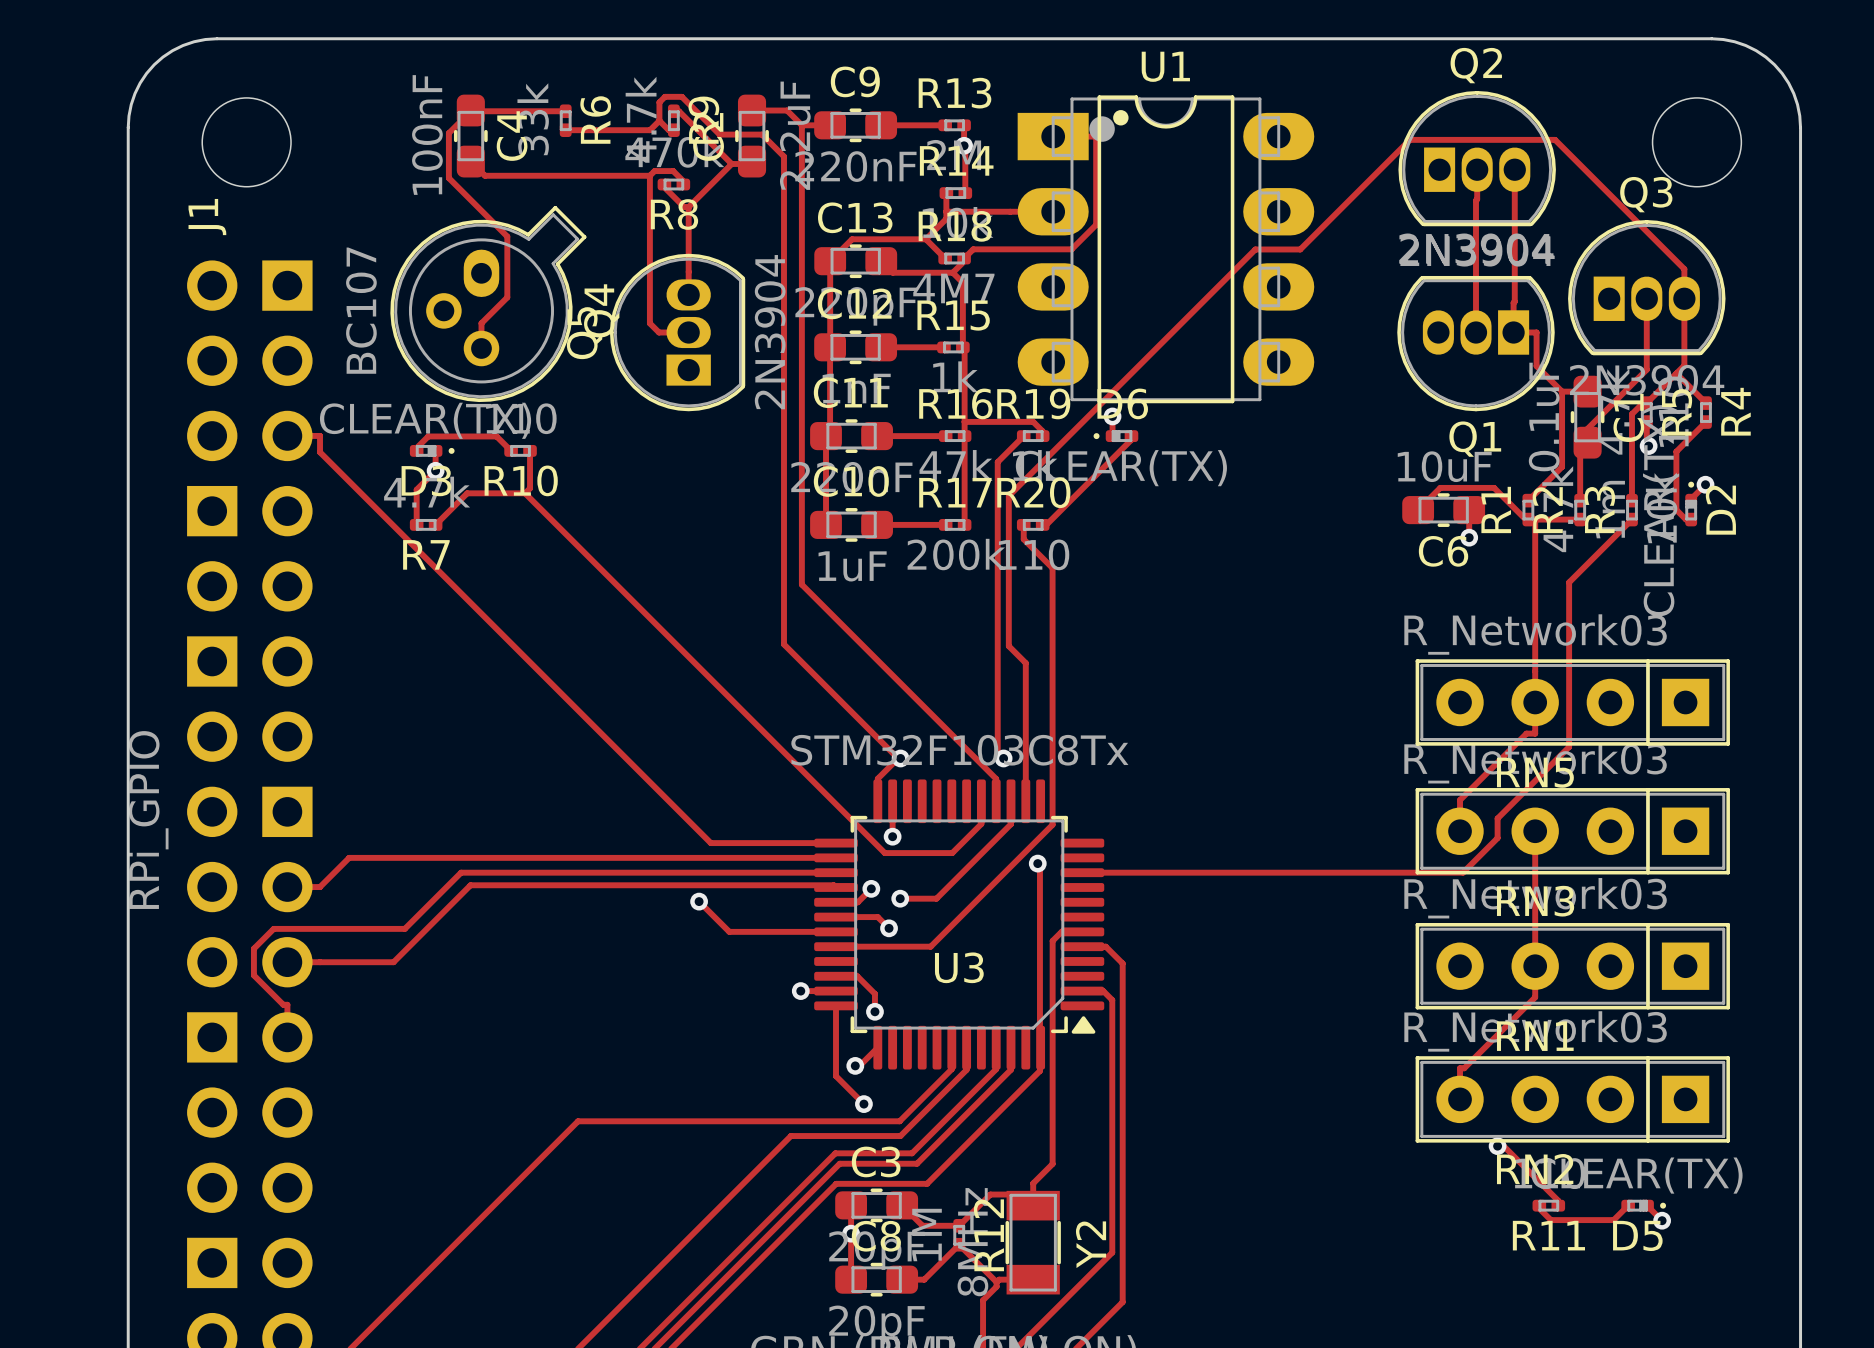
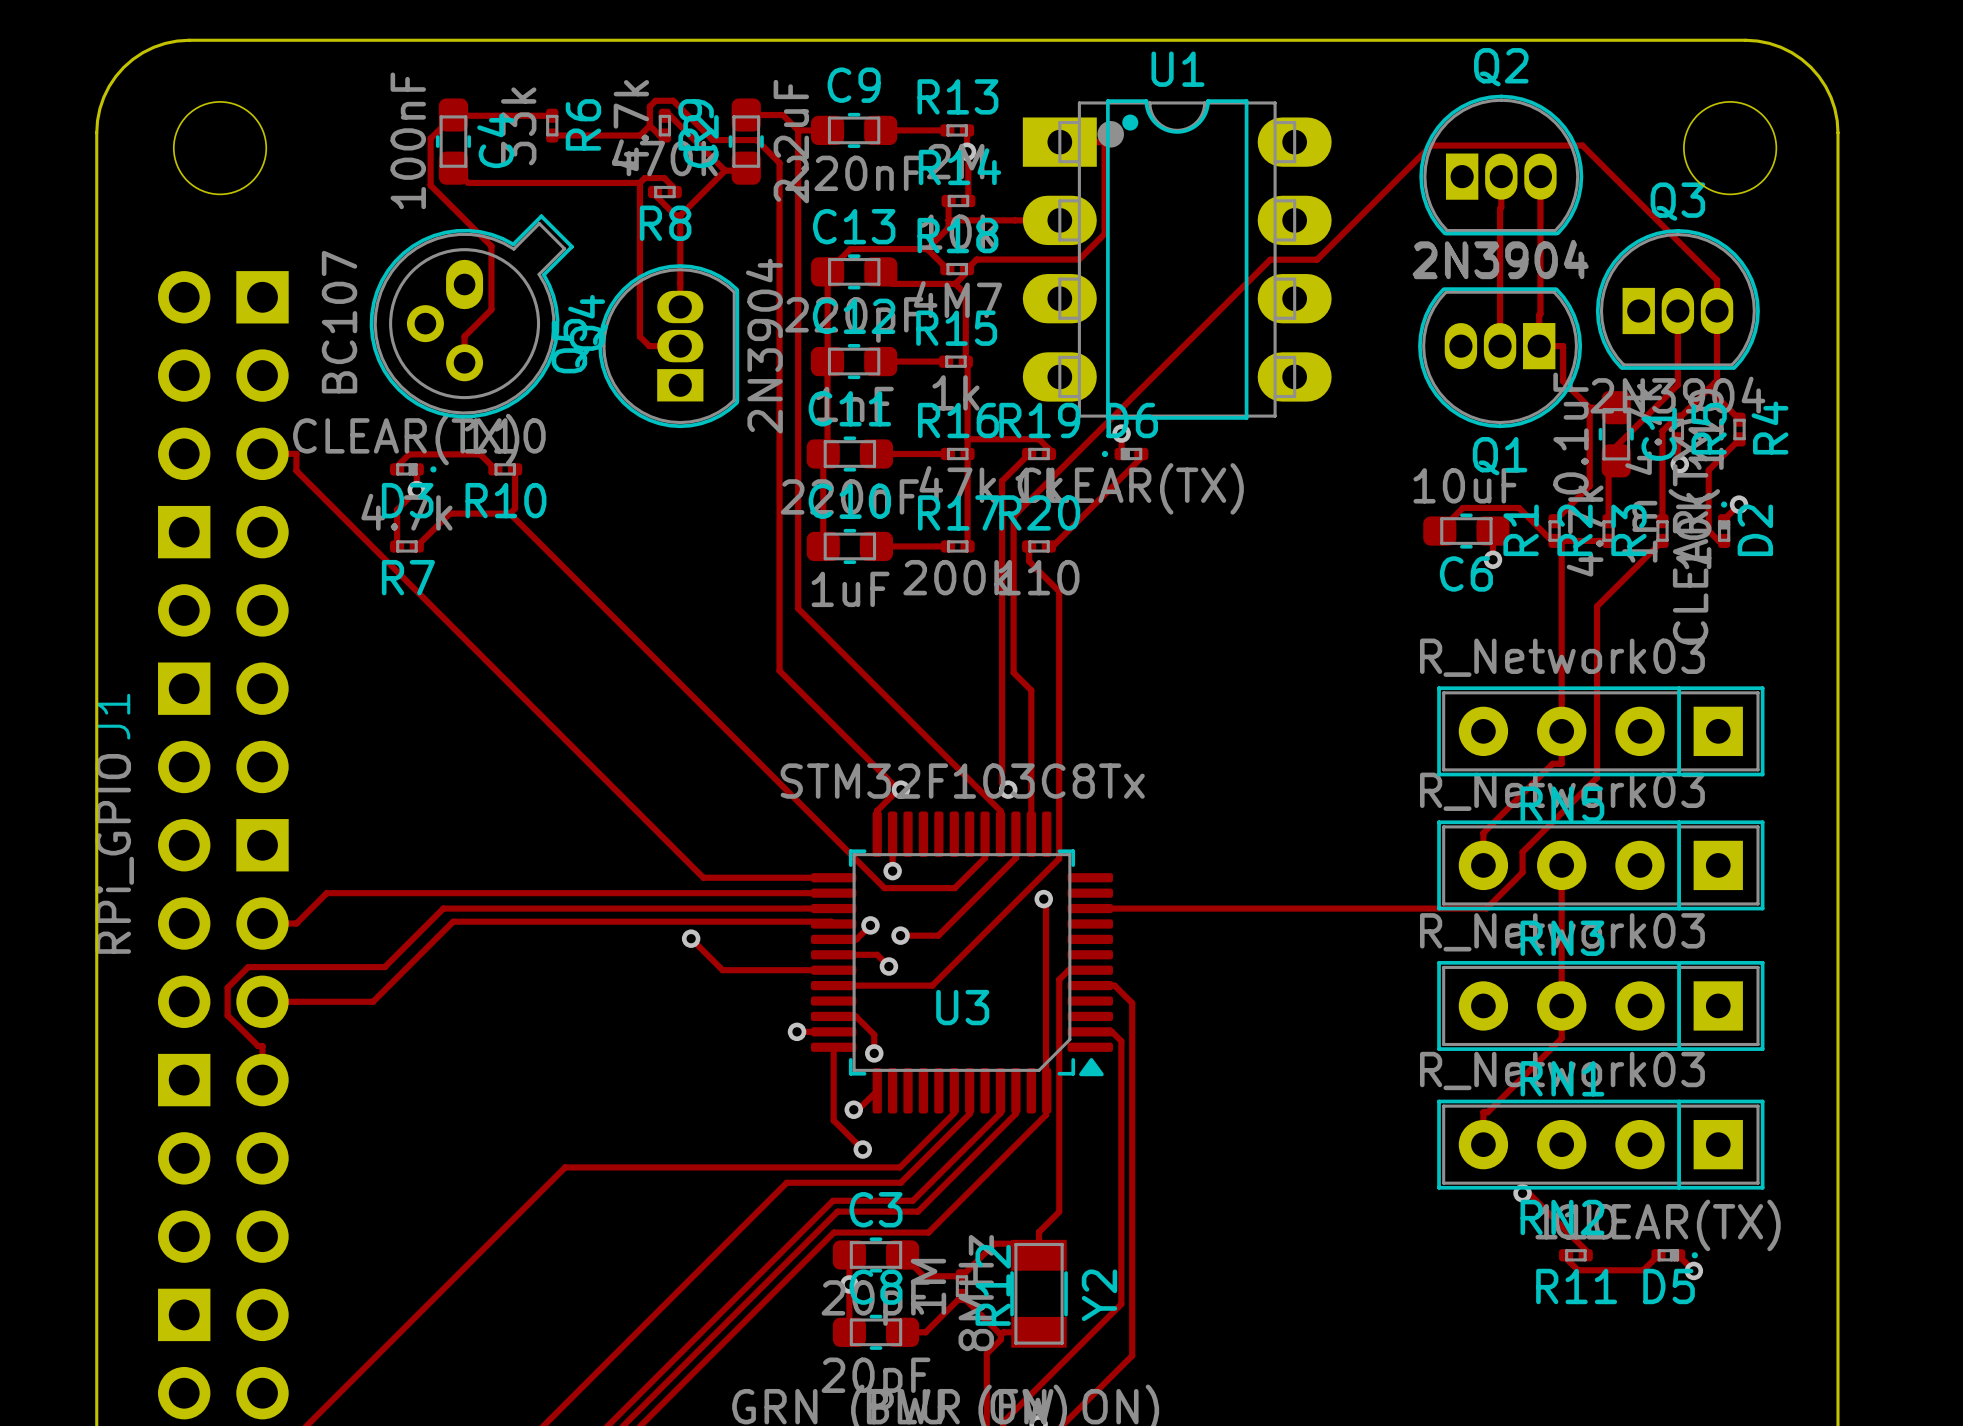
J1 name position: J1 (207, 217) -> J1 (113, 716)

